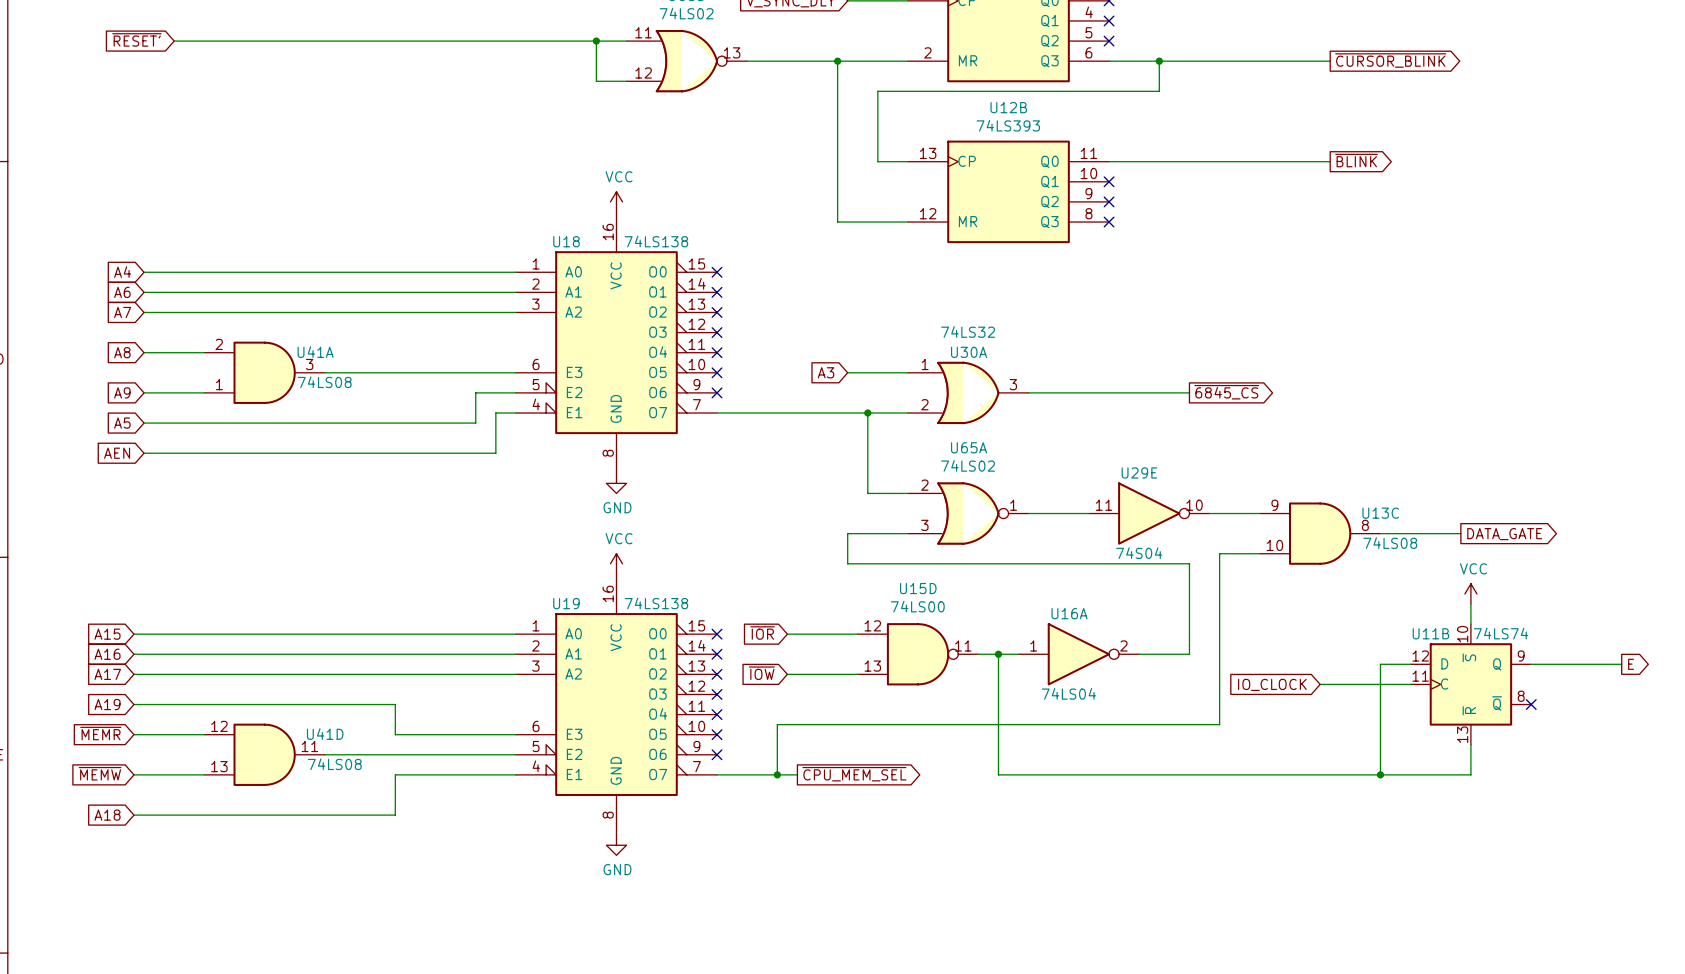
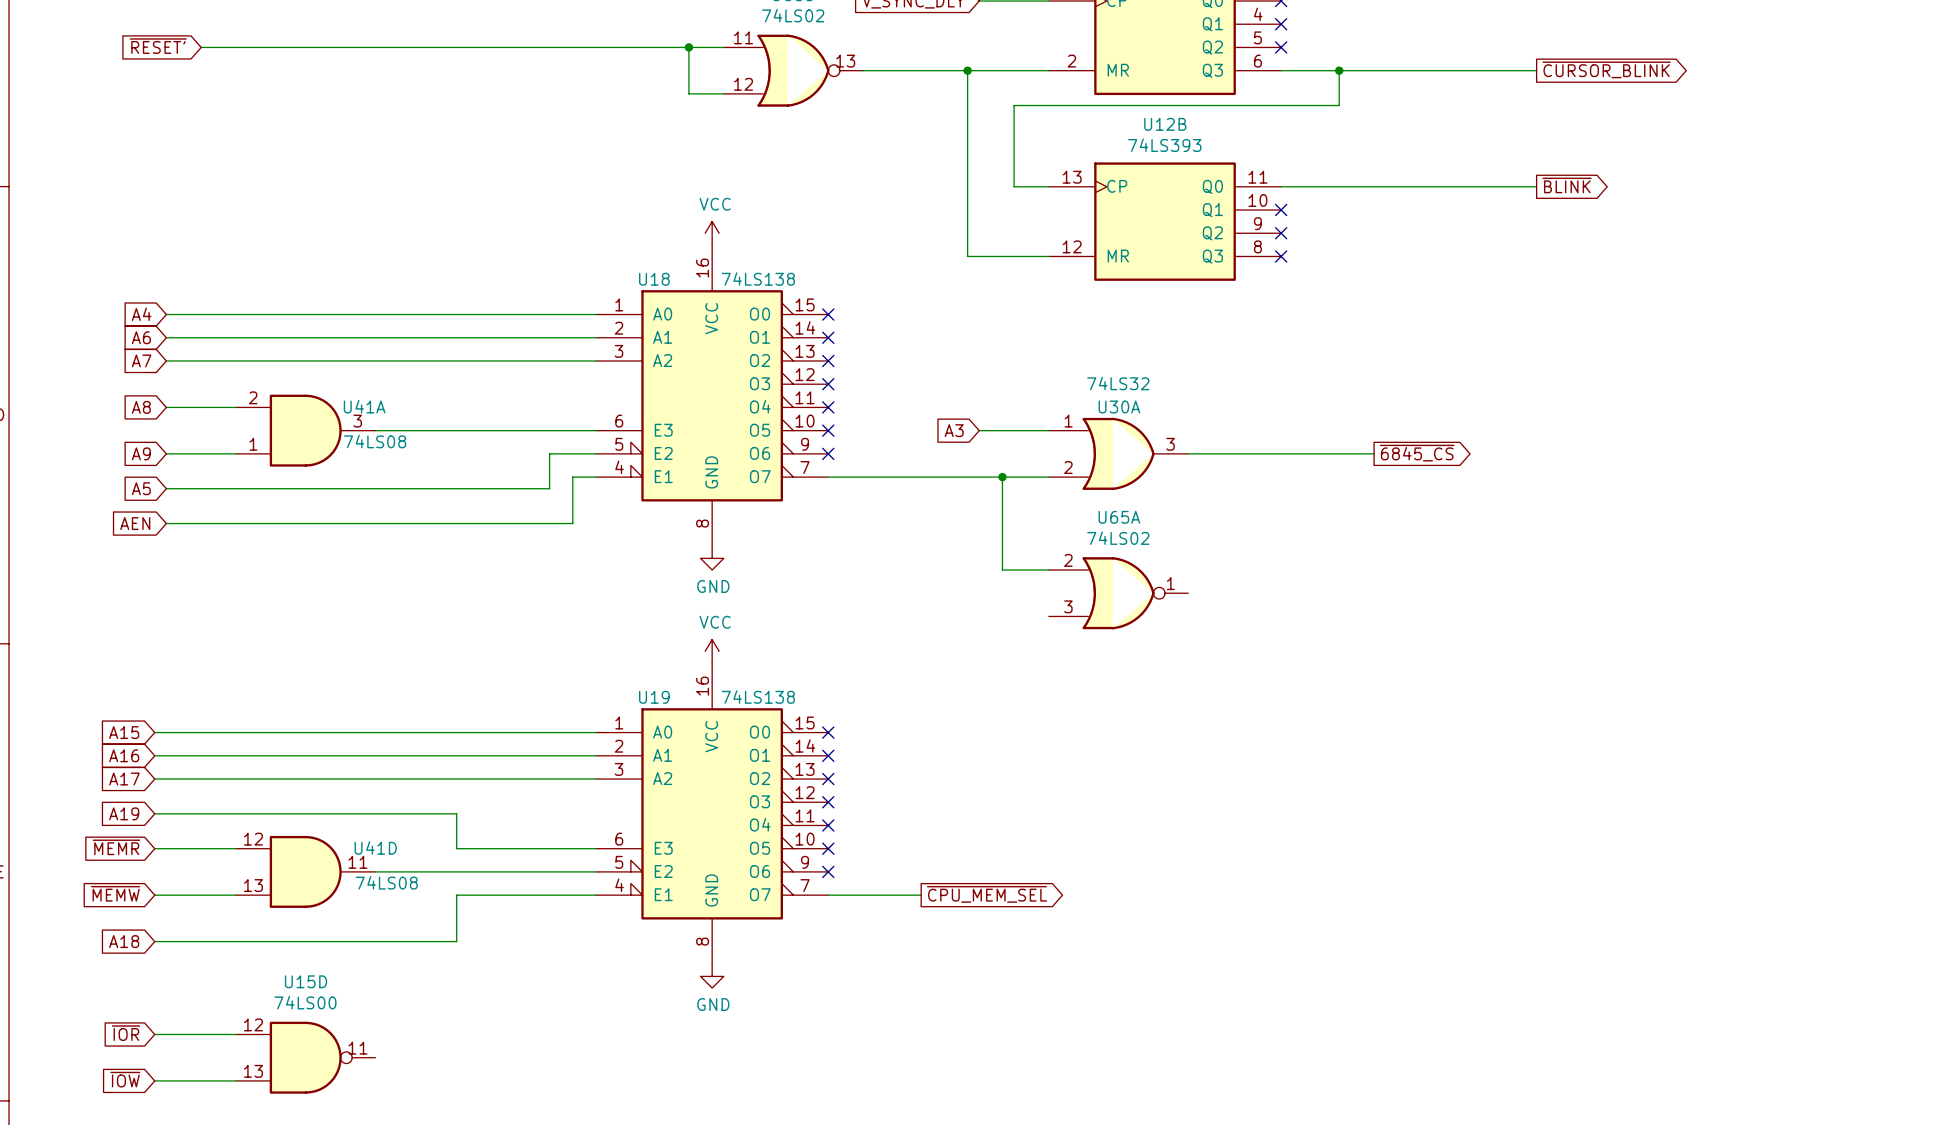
wire: (1028, 513) (1088, 513) -> none
U29E: 74S04 (1149, 513) -> none
wire: (1209, 513) (1259, 513) -> none
wire: (908, 533) (847, 533) (847, 563) (1189, 563) (1189, 654) (1139, 654) -> none
U13C: 74LS08 (1320, 533) -> none
wire: (1380, 533) (1460, 533) -> none
global label: DATA_GATE (1504, 534) -> none
wire: (1259, 553) (1219, 553) (1219, 724) (777, 724) (777, 774) -> none
power symbol: VCC (1470, 593) -> none
wire: (1470, 604) (1470, 624) -> none
global label: ~{IOR} (762, 633) -> none
wire: (787, 634) (857, 634) -> none
U15D position: (918, 654) -> (305, 1057)
wire: (978, 654) (1018, 654) -> none
wire: (998, 654) (998, 774) (1470, 774) (1470, 744) -> none
junction: (998, 654) -> none
U16A: 74LS04 (1078, 654) -> none
wire: (1410, 664) (1380, 664) (1380, 774) -> none
wire: (1531, 664) (1621, 664) -> none
global label: E (1631, 664) -> none
global label: ~{IOW} (761, 673) -> none
wire: (787, 674) (857, 674) -> none
global label: IO_CLOCK (1272, 684) -> none
wire: (1320, 684) (1410, 684) -> none
U11B: 74LS74 (1470, 684) -> none
no-connect mark: (1531, 704) -> none
junction: (777, 774) -> none
junction: (1380, 774) -> none
global label: none -> ~{IOR} (126, 1033)
wire: none -> (154, 1034) (236, 1034)
global label: none -> ~{IOW} (125, 1079)
wire: none -> (154, 1080) (236, 1080)

